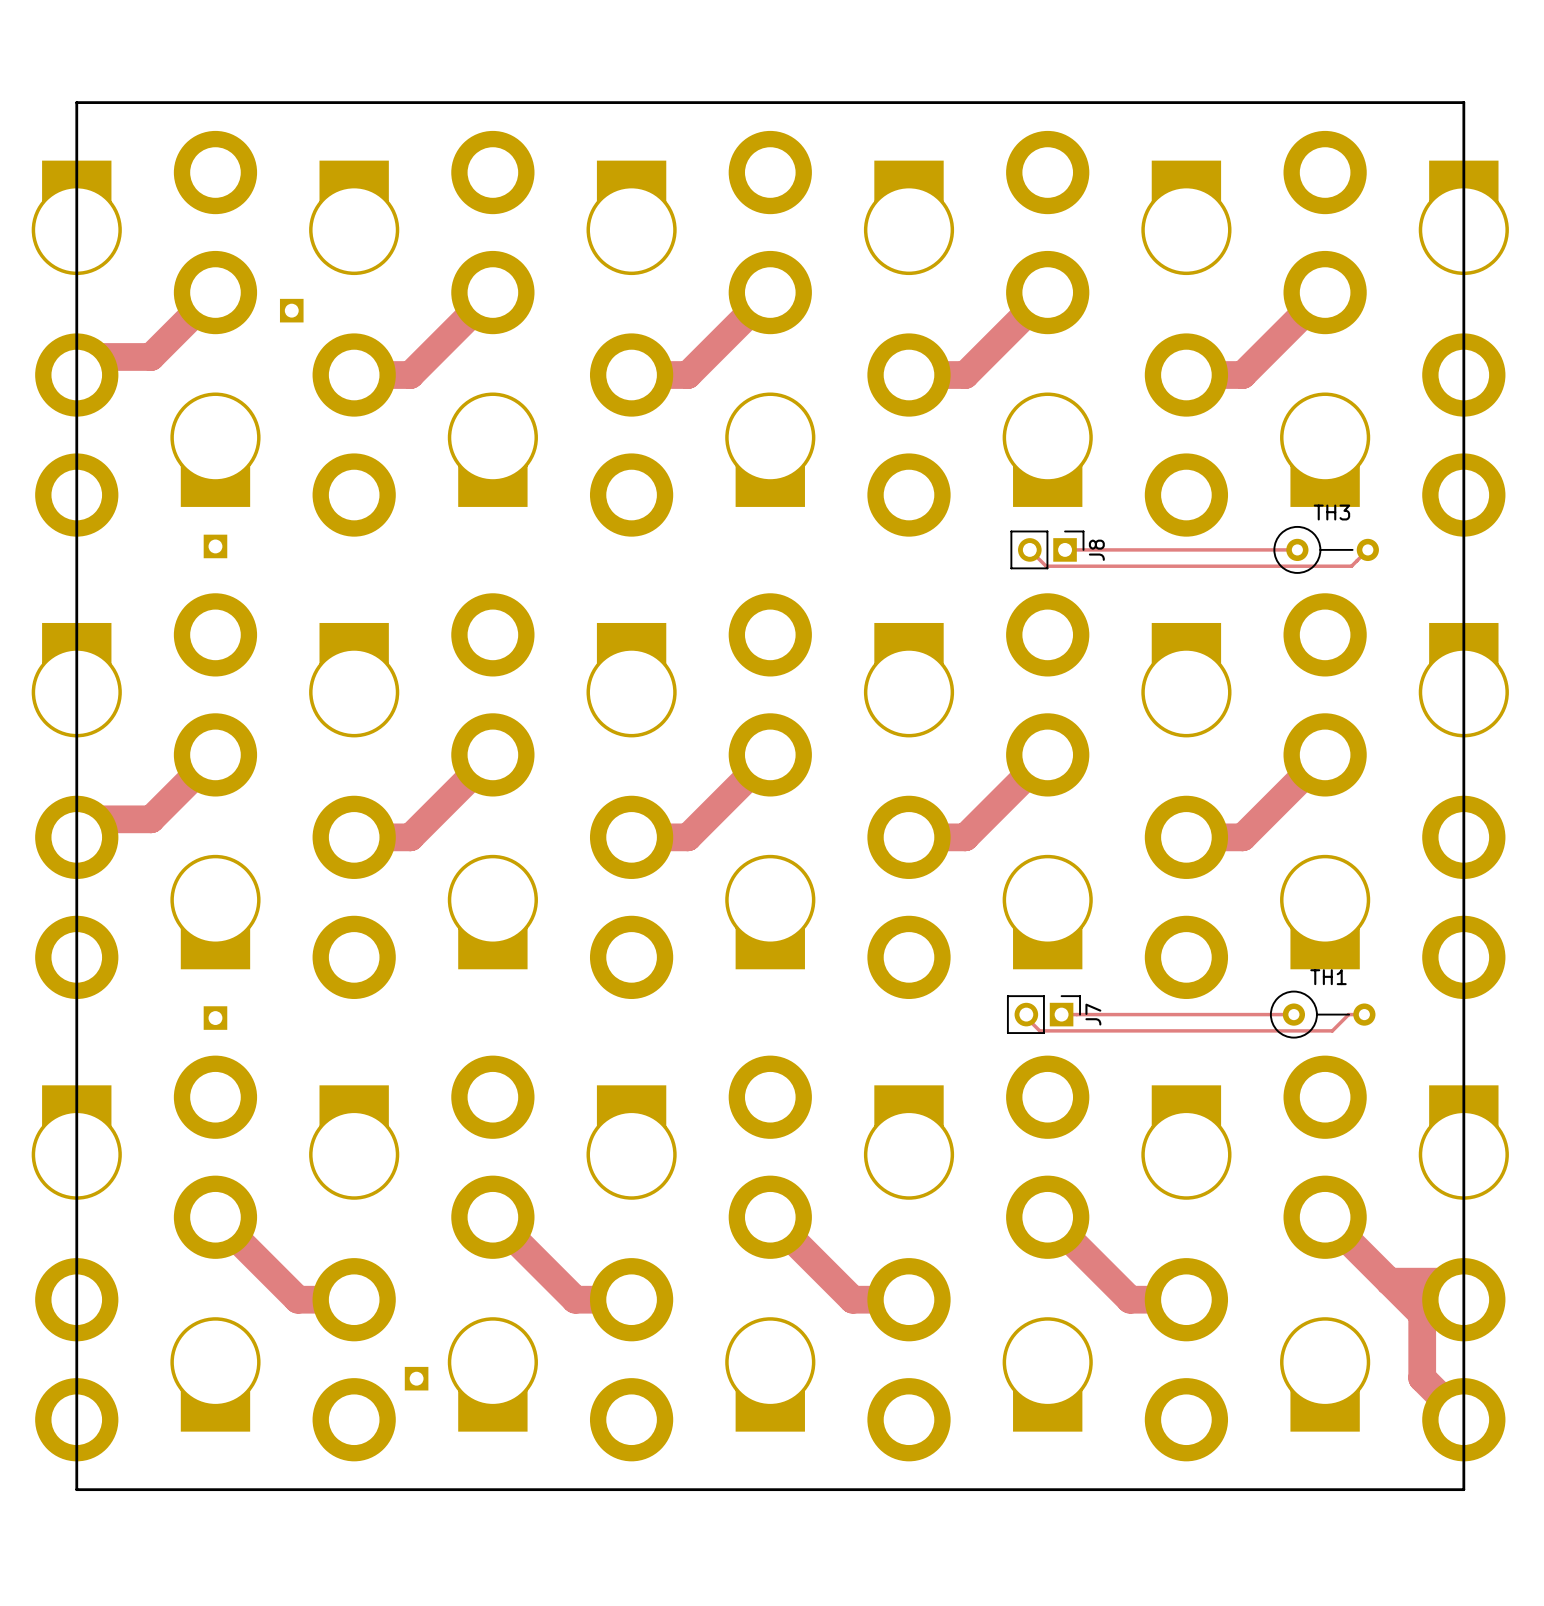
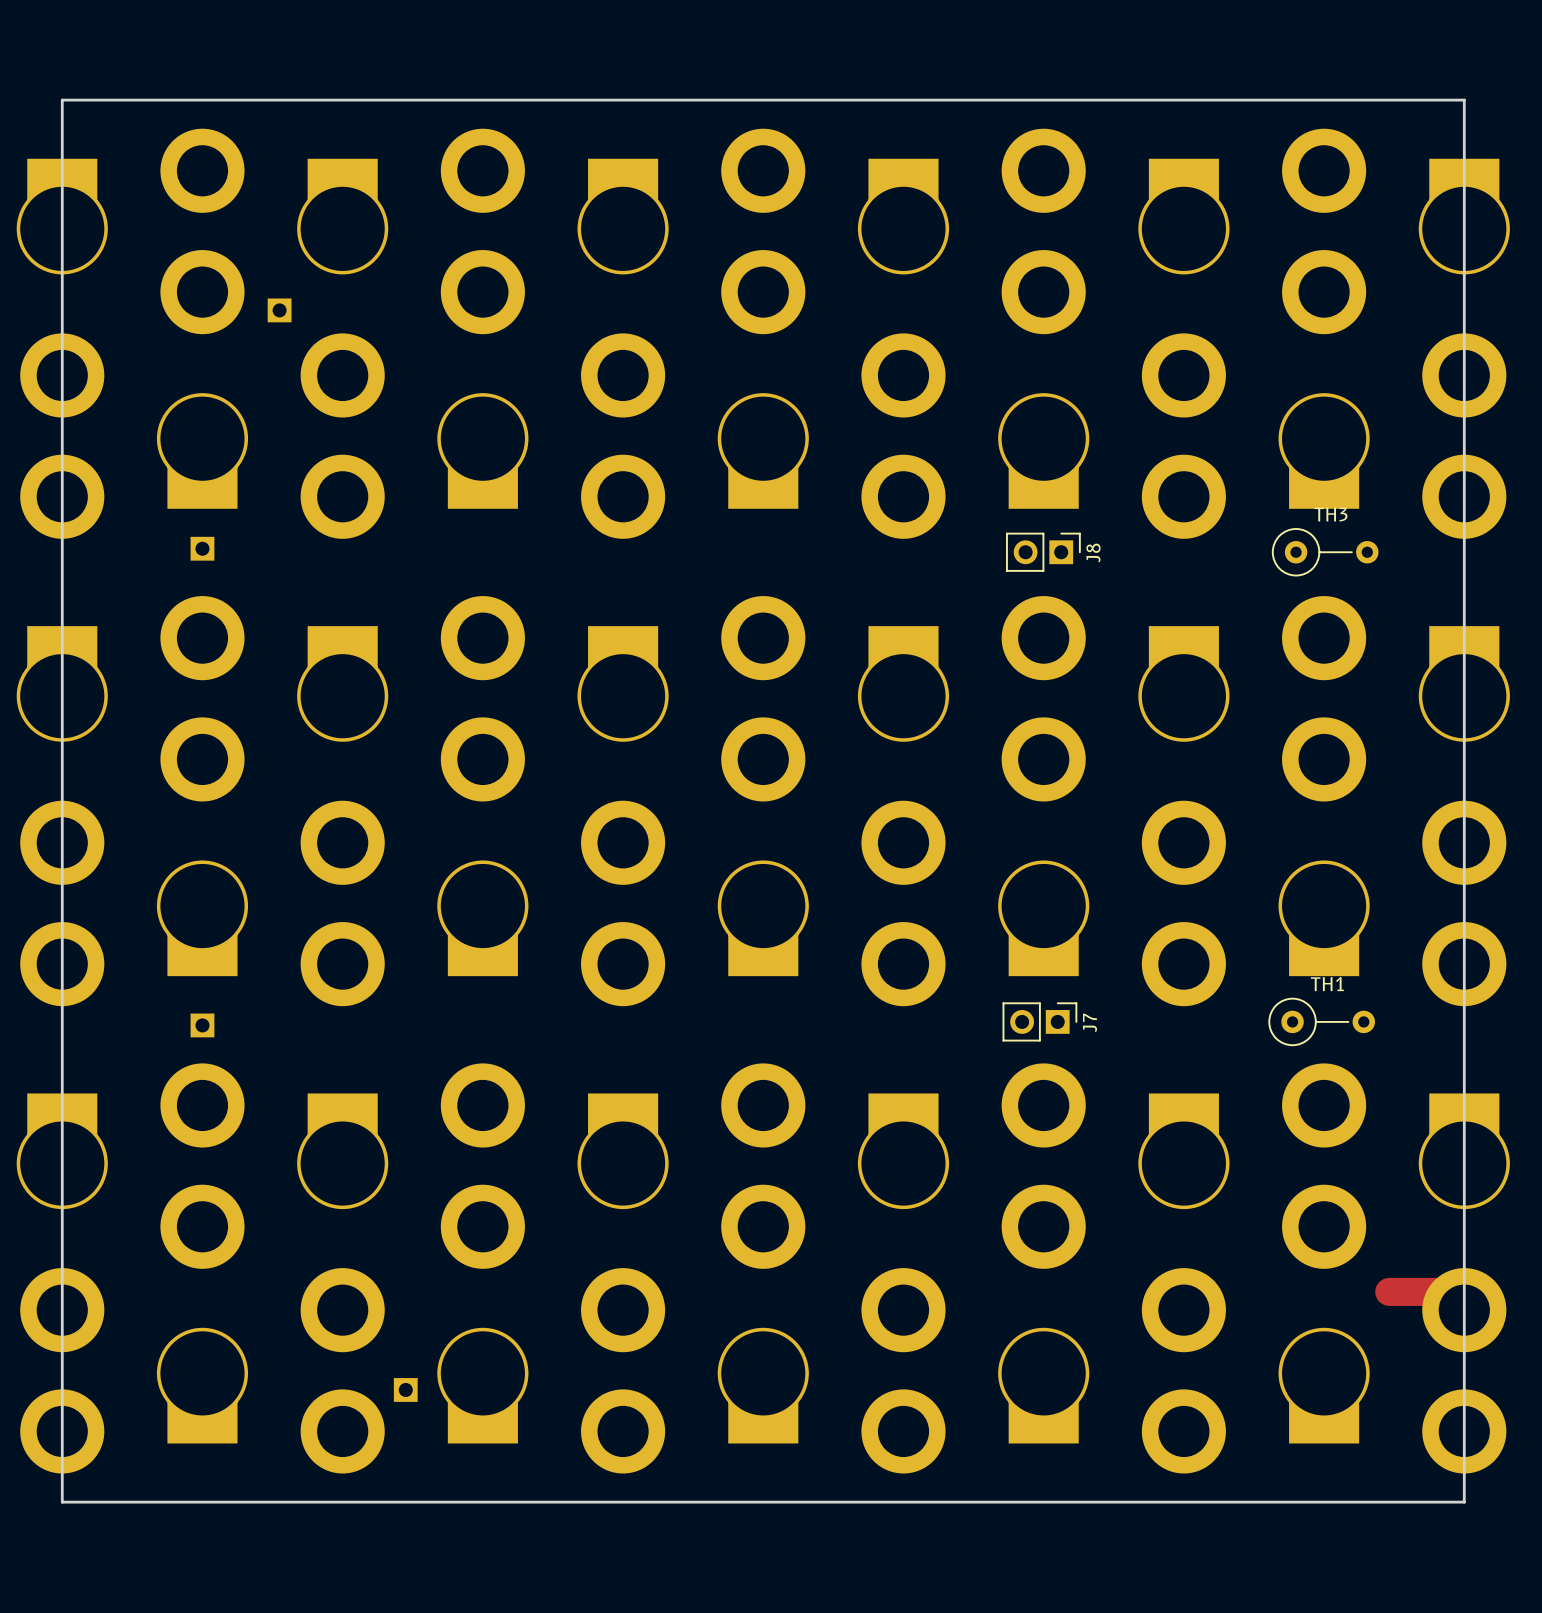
track: (215, 292) (151, 356) (94, 356) -> none
track: (492, 292) (410, 375) (354, 375) -> none
track: (770, 292) (687, 375) (631, 375) -> none
track: (1047, 292) (965, 375) (909, 375) -> none
track: (1325, 292) (1242, 375) (1186, 375) -> none
track: (1029, 549) (1046, 566) (1351, 566) (1367, 549) -> none
track: (1065, 549) (1297, 549) -> none
track: (215, 754) (151, 819) (94, 819) -> none
track: (492, 754) (410, 837) (354, 837) -> none
track: (770, 754) (687, 837) (631, 837) -> none
track: (1047, 754) (965, 837) (909, 837) -> none
track: (1325, 754) (1242, 837) (1186, 837) -> none
track: (1026, 1014) (1026, 1017) (1039, 1030) (1332, 1030) (1348, 1014) (1364, 1014) -> none
track: (1061, 1014) (1293, 1014) -> none
track: (215, 1217) (297, 1299) (354, 1299) -> none
track: (492, 1217) (575, 1299) (631, 1299) -> none
track: (770, 1217) (852, 1299) (909, 1299) -> none
track: (1047, 1217) (1130, 1299) (1186, 1299) -> none
track: (1325, 1217) (1422, 1314) (1422, 1378) (1445, 1401) -> none

